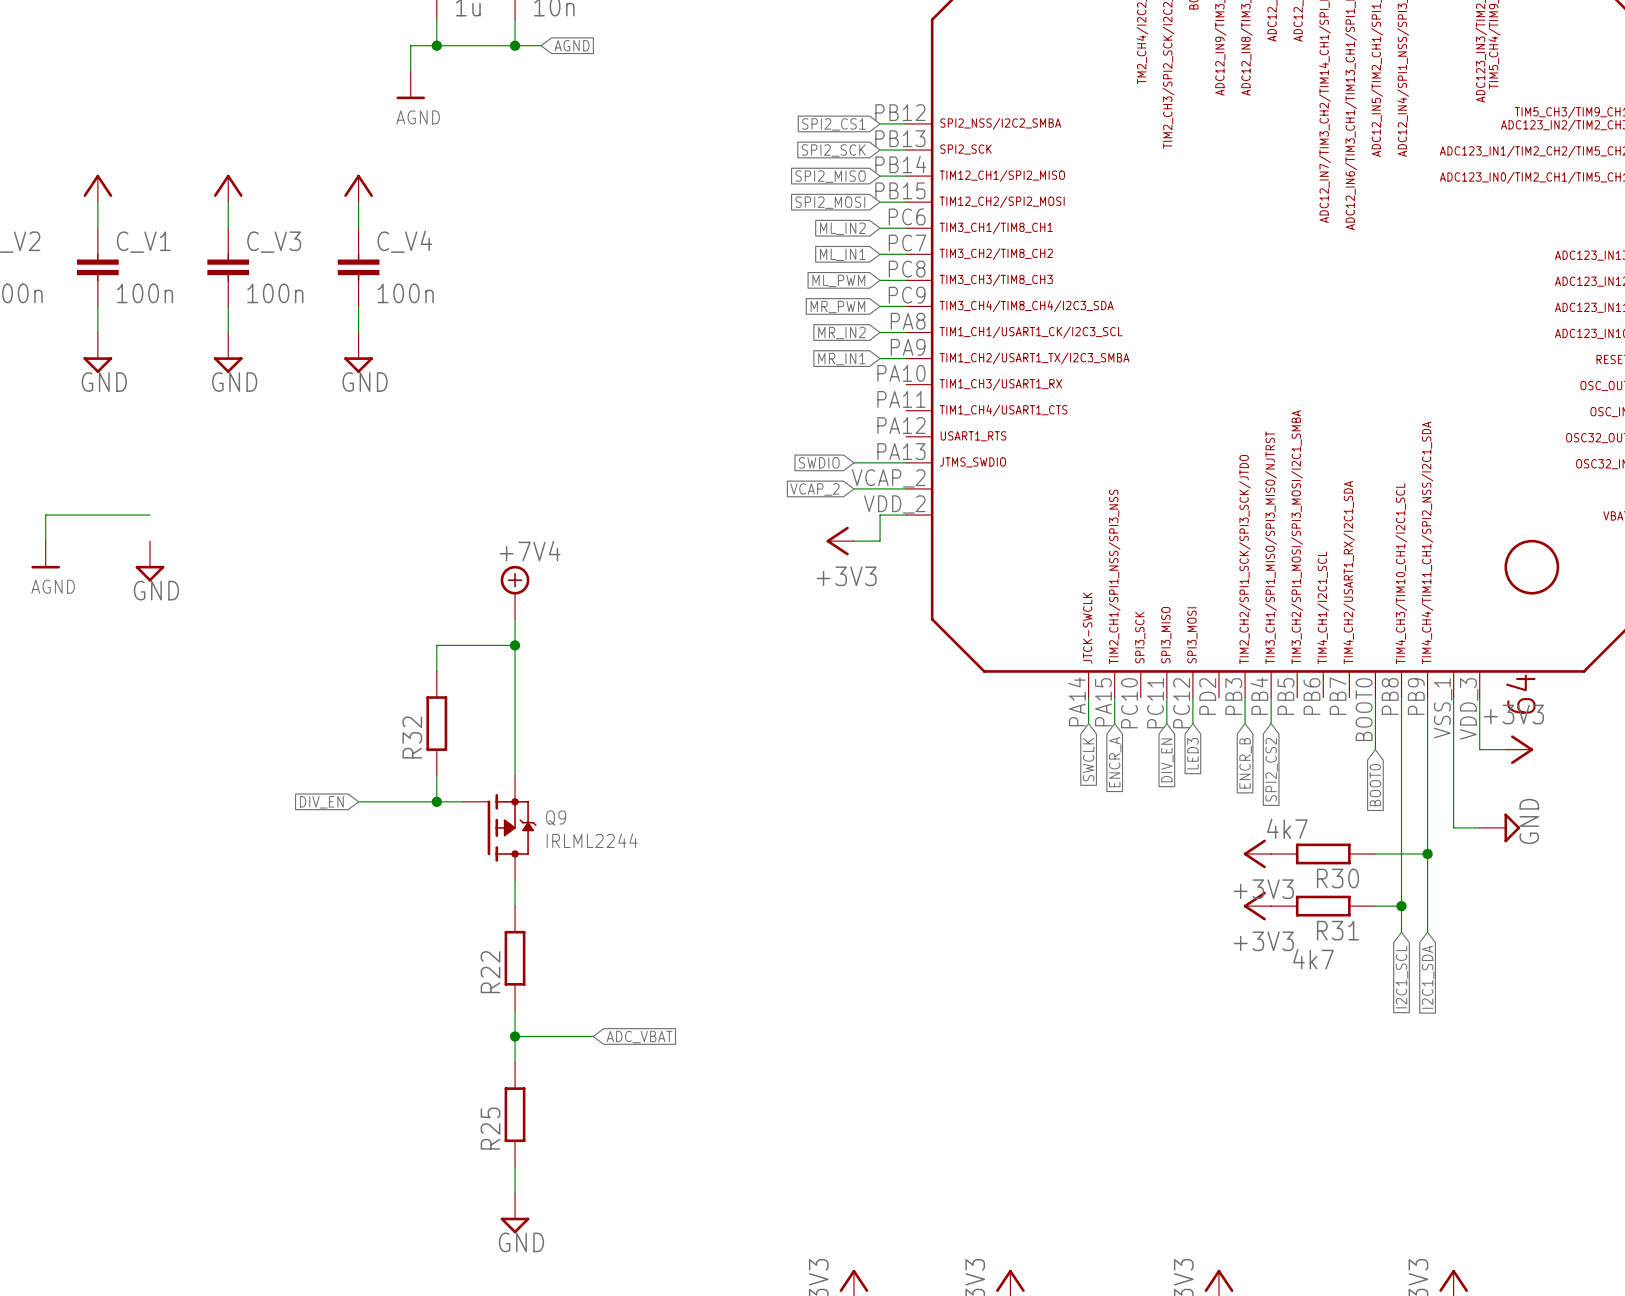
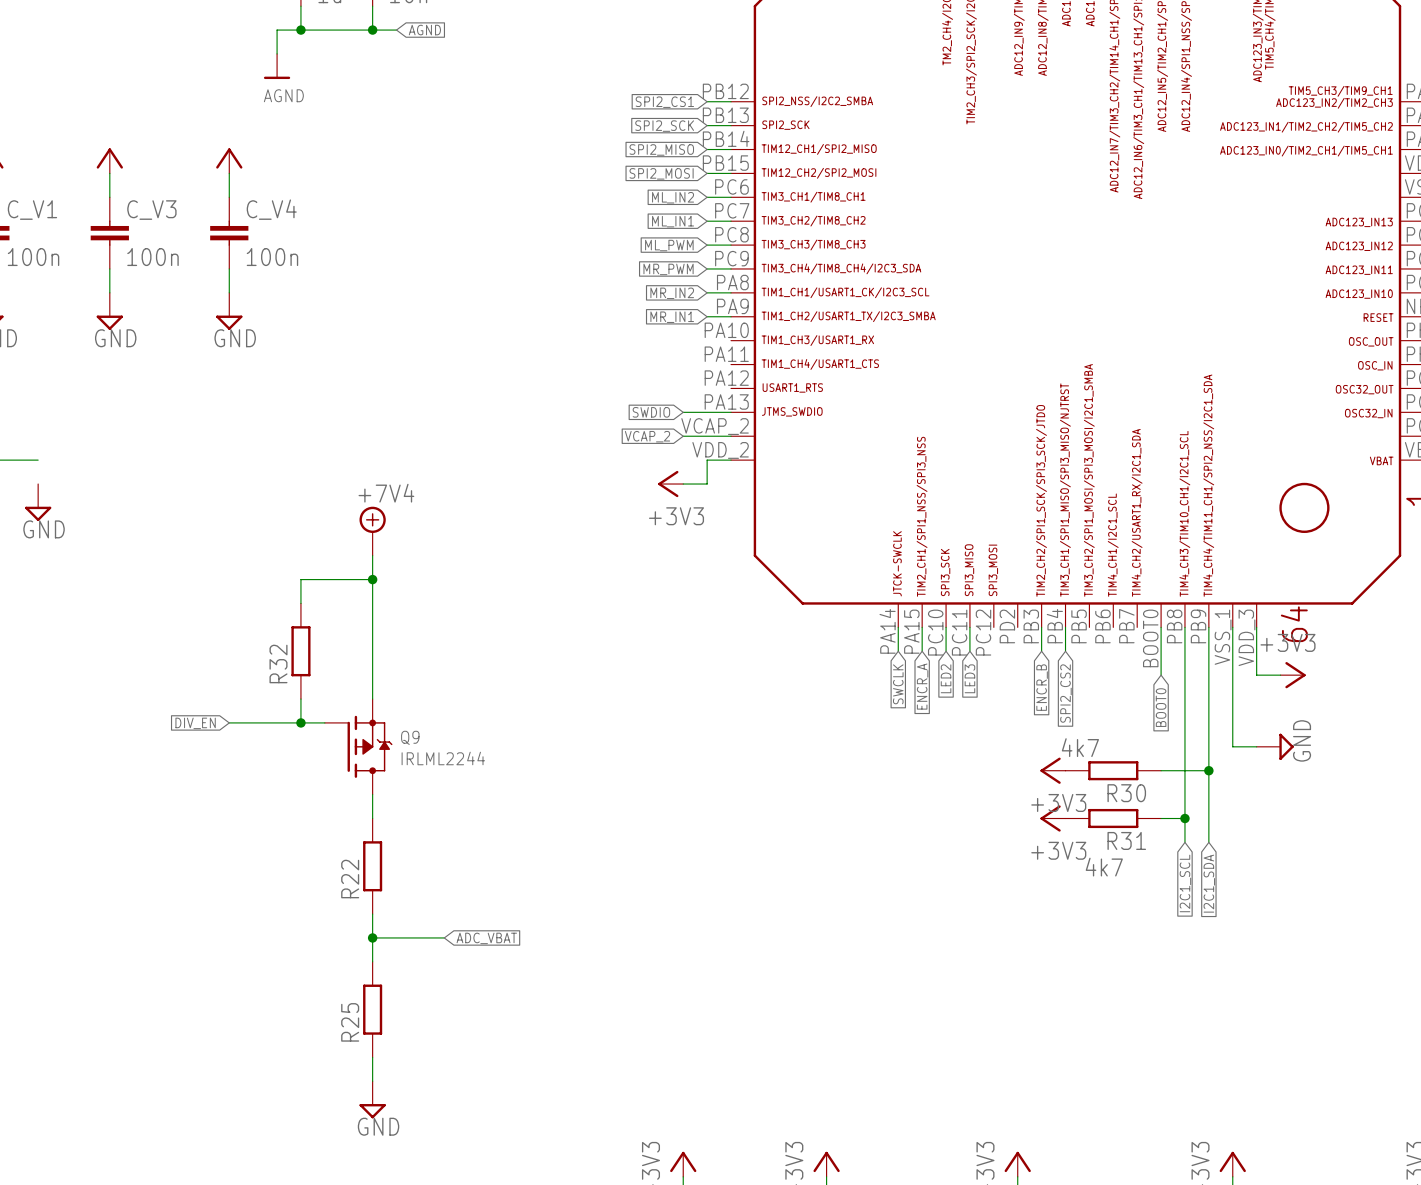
wire: (1192, 697) (1192, 723) -> (946, 627) (946, 651)
global label: none -> LED2 (946, 678)
global label: LED3 (1192, 753) -> none
global label: DIV_EN (1167, 760) -> LED3 (969, 678)

